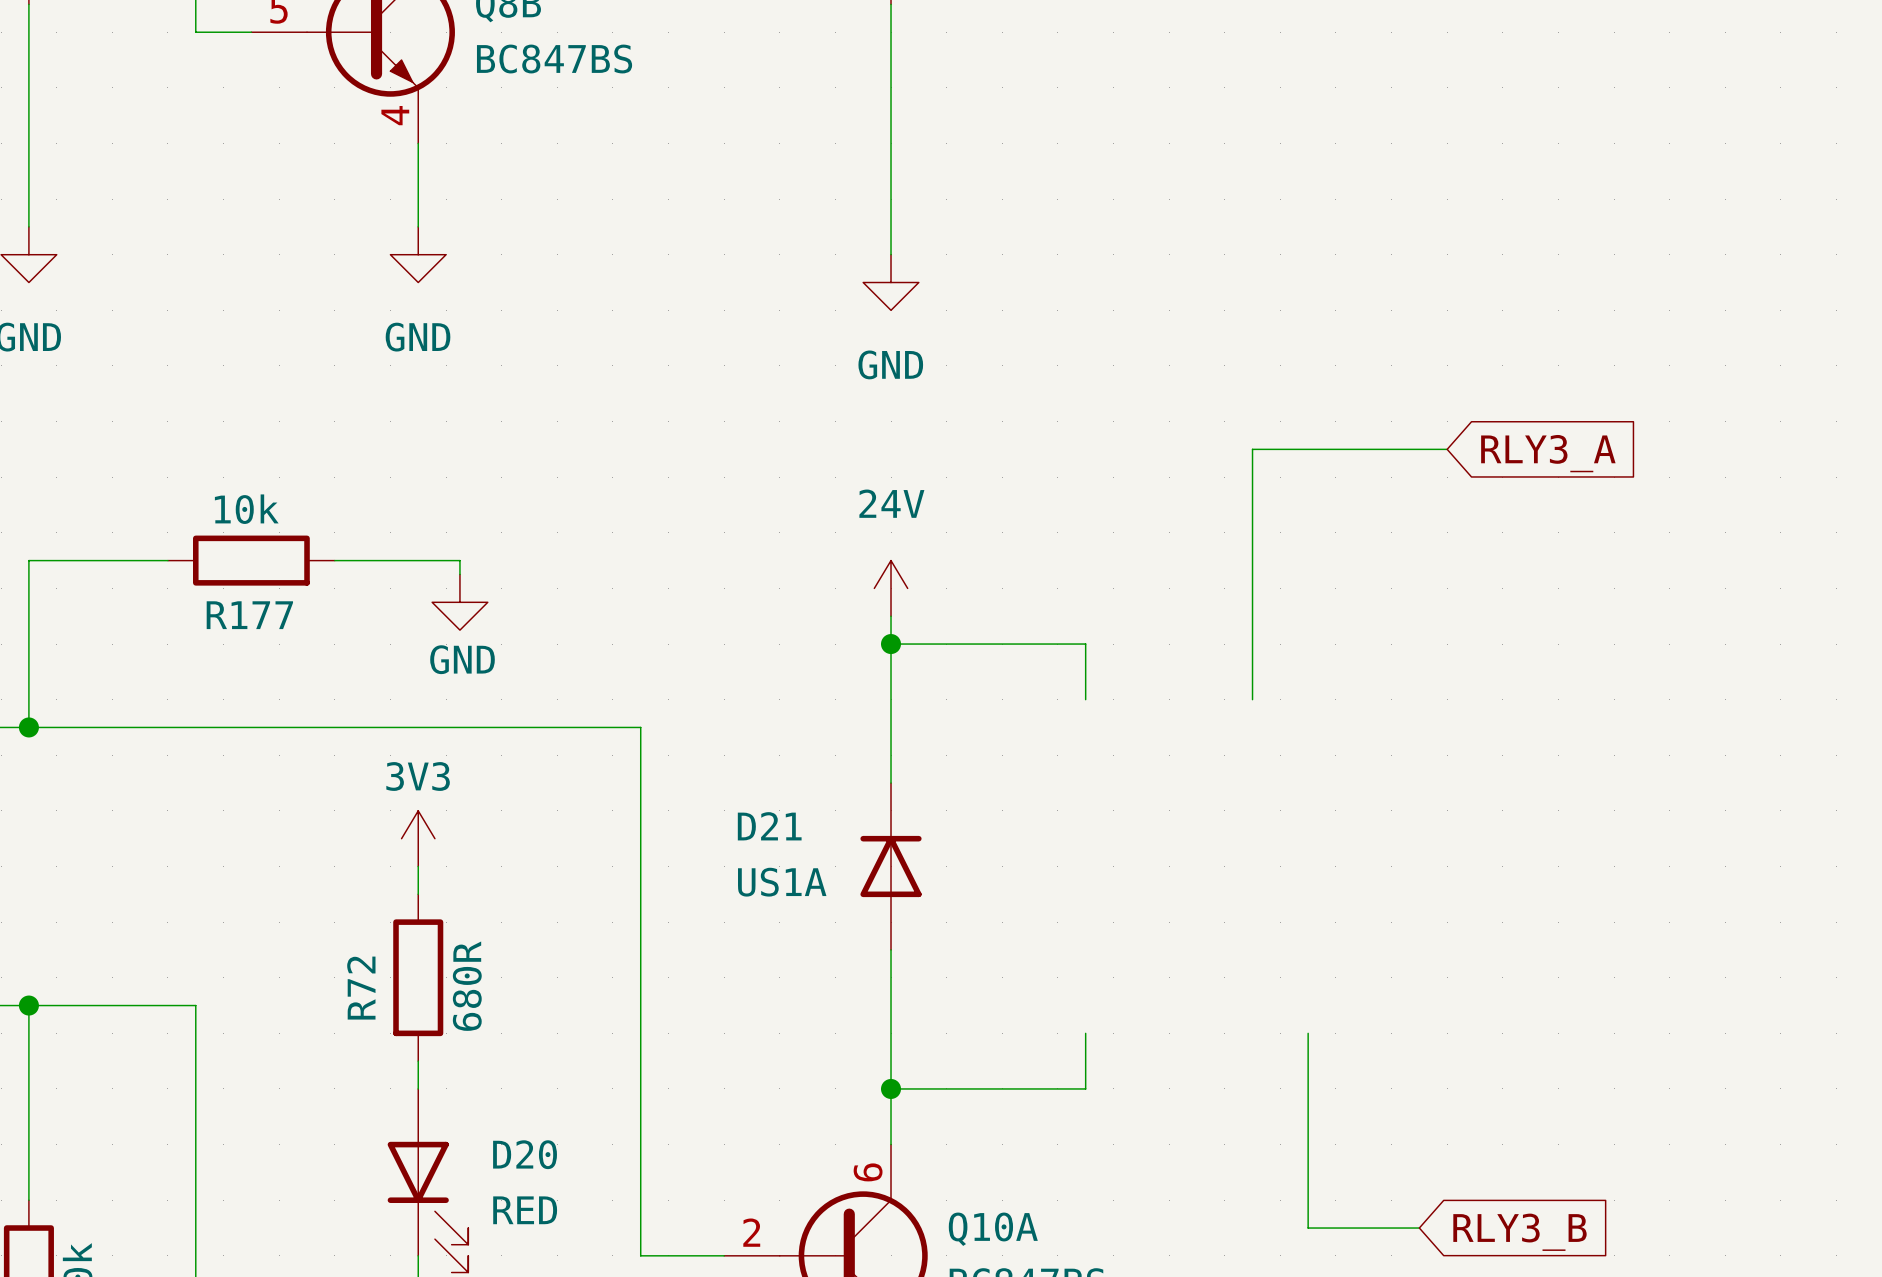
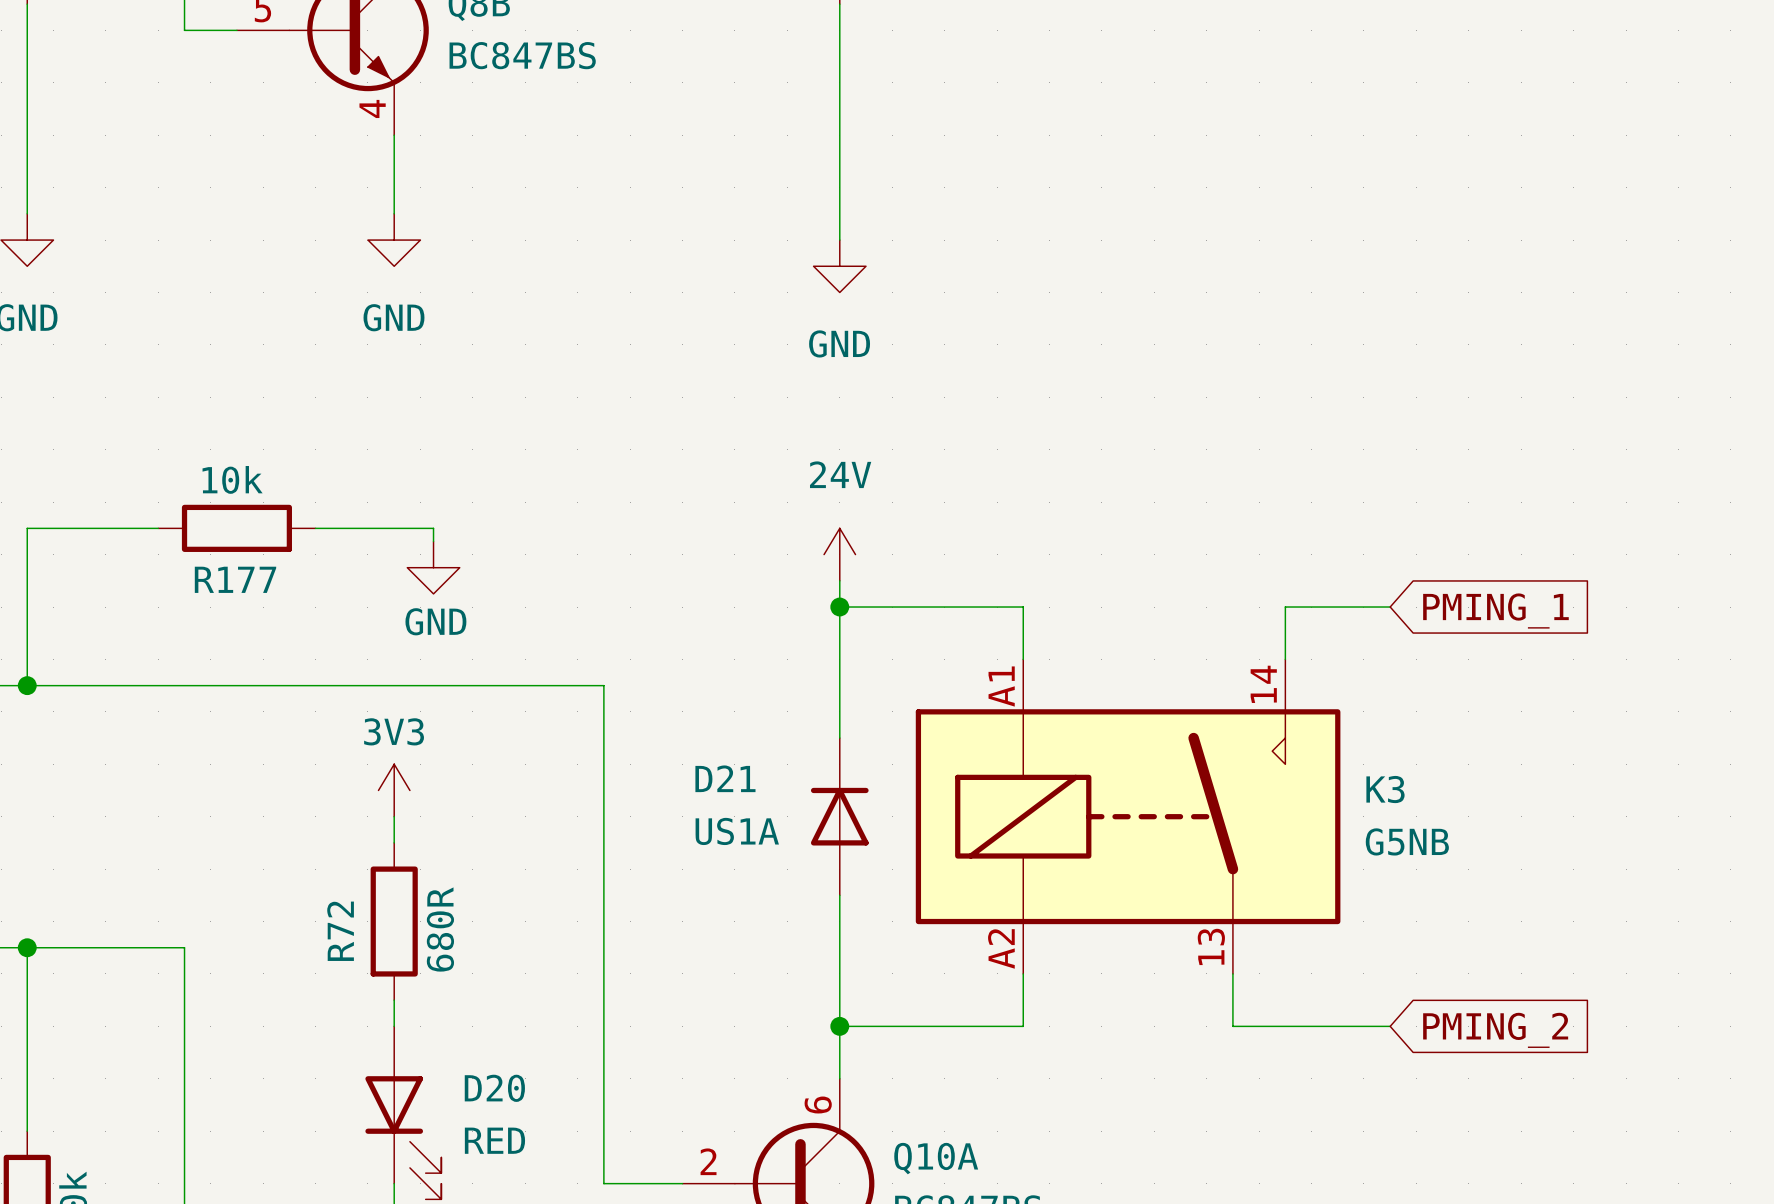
wire: (1447, 449) (1252, 449) (1252, 699) -> none
global label: RLY3_A (1548, 453) -> none
wire: none -> (1390, 607) (1285, 607) (1285, 659)
global label: none -> PMING_1 (1495, 611)
K3: none -> G5NB (1128, 816)
wire: (1308, 1088) (1308, 1228) (1419, 1228) -> (1232, 1026) (1390, 1026)
global label: none -> PMING_2 (1495, 1030)
global label: RLY3_B (1519, 1232) -> none

